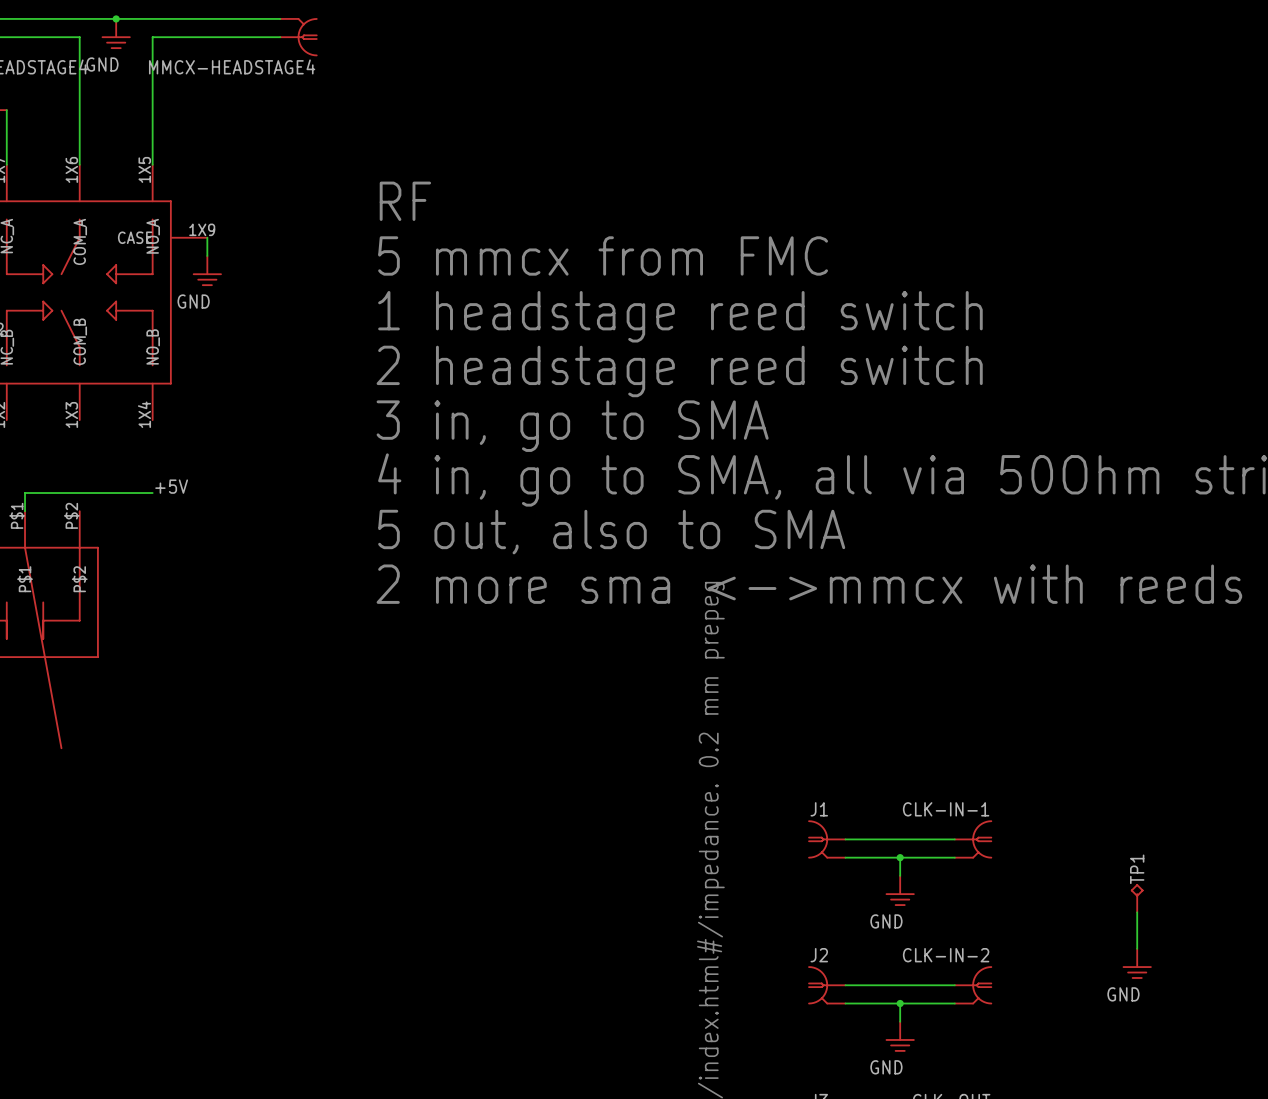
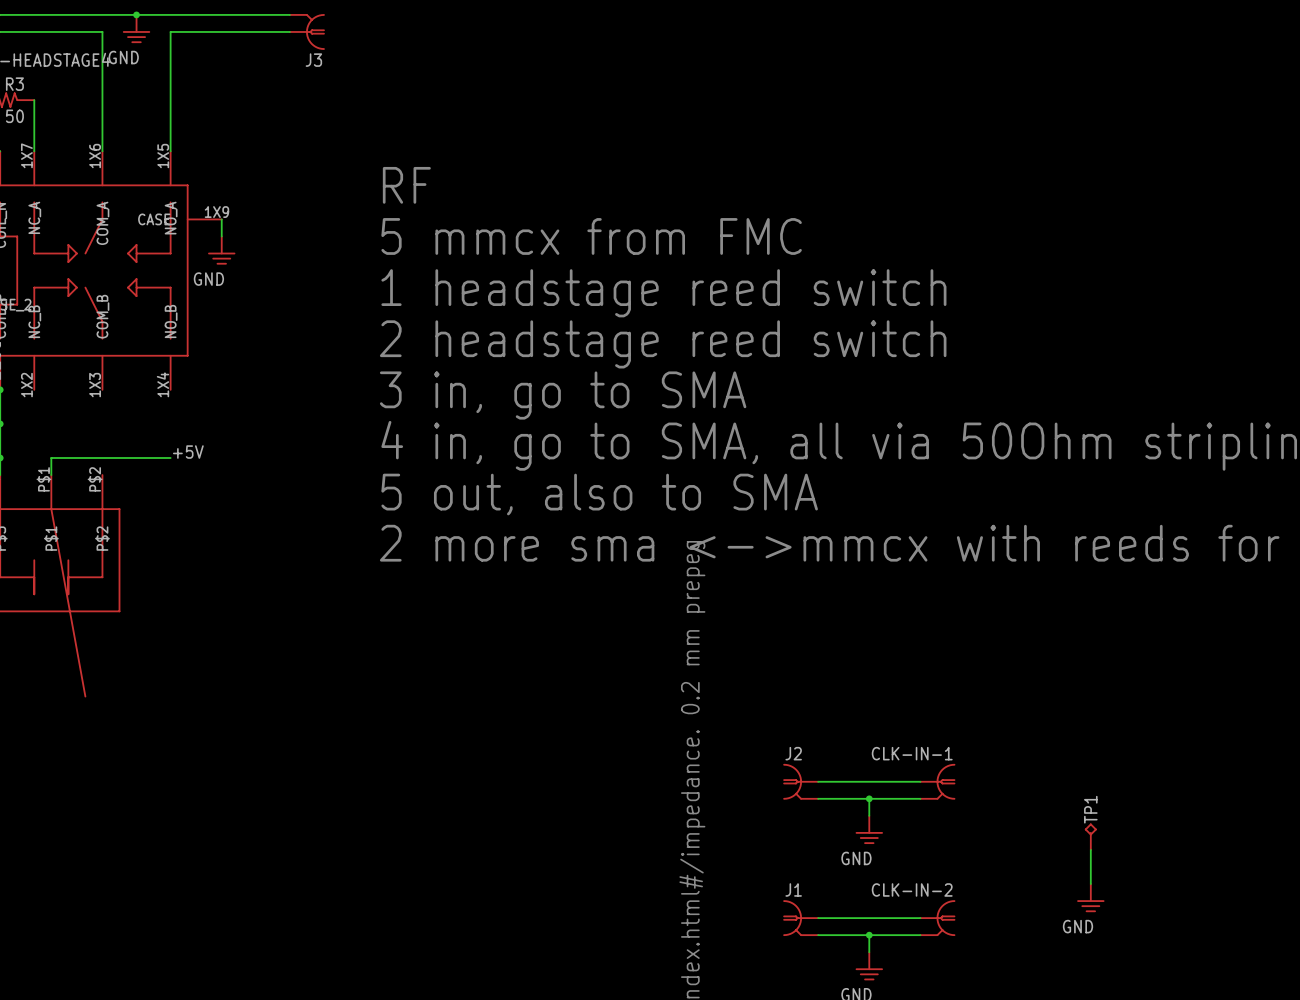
MMCX-HEADSTAGE4 name: MMCX-HEADSTAGE4 (232, 66) -> J3 (313, 60)
J1 name: J1 (819, 809) -> J2 (793, 753)
J2 name: J2 (819, 955) -> J1 (793, 889)

